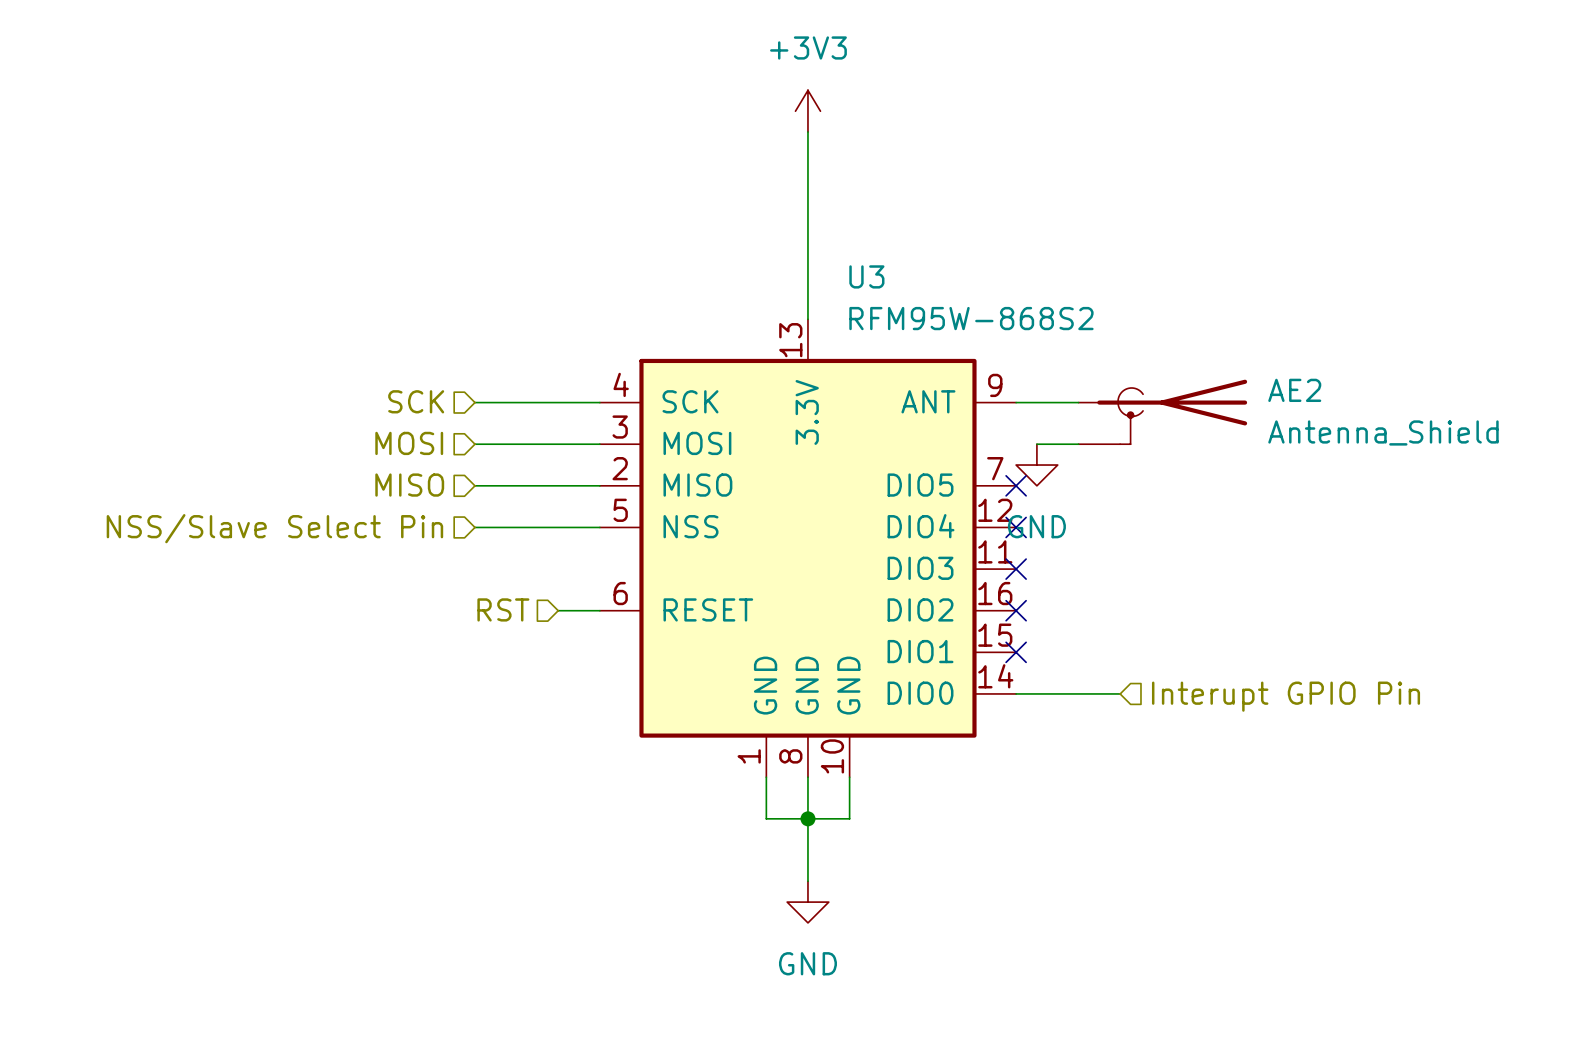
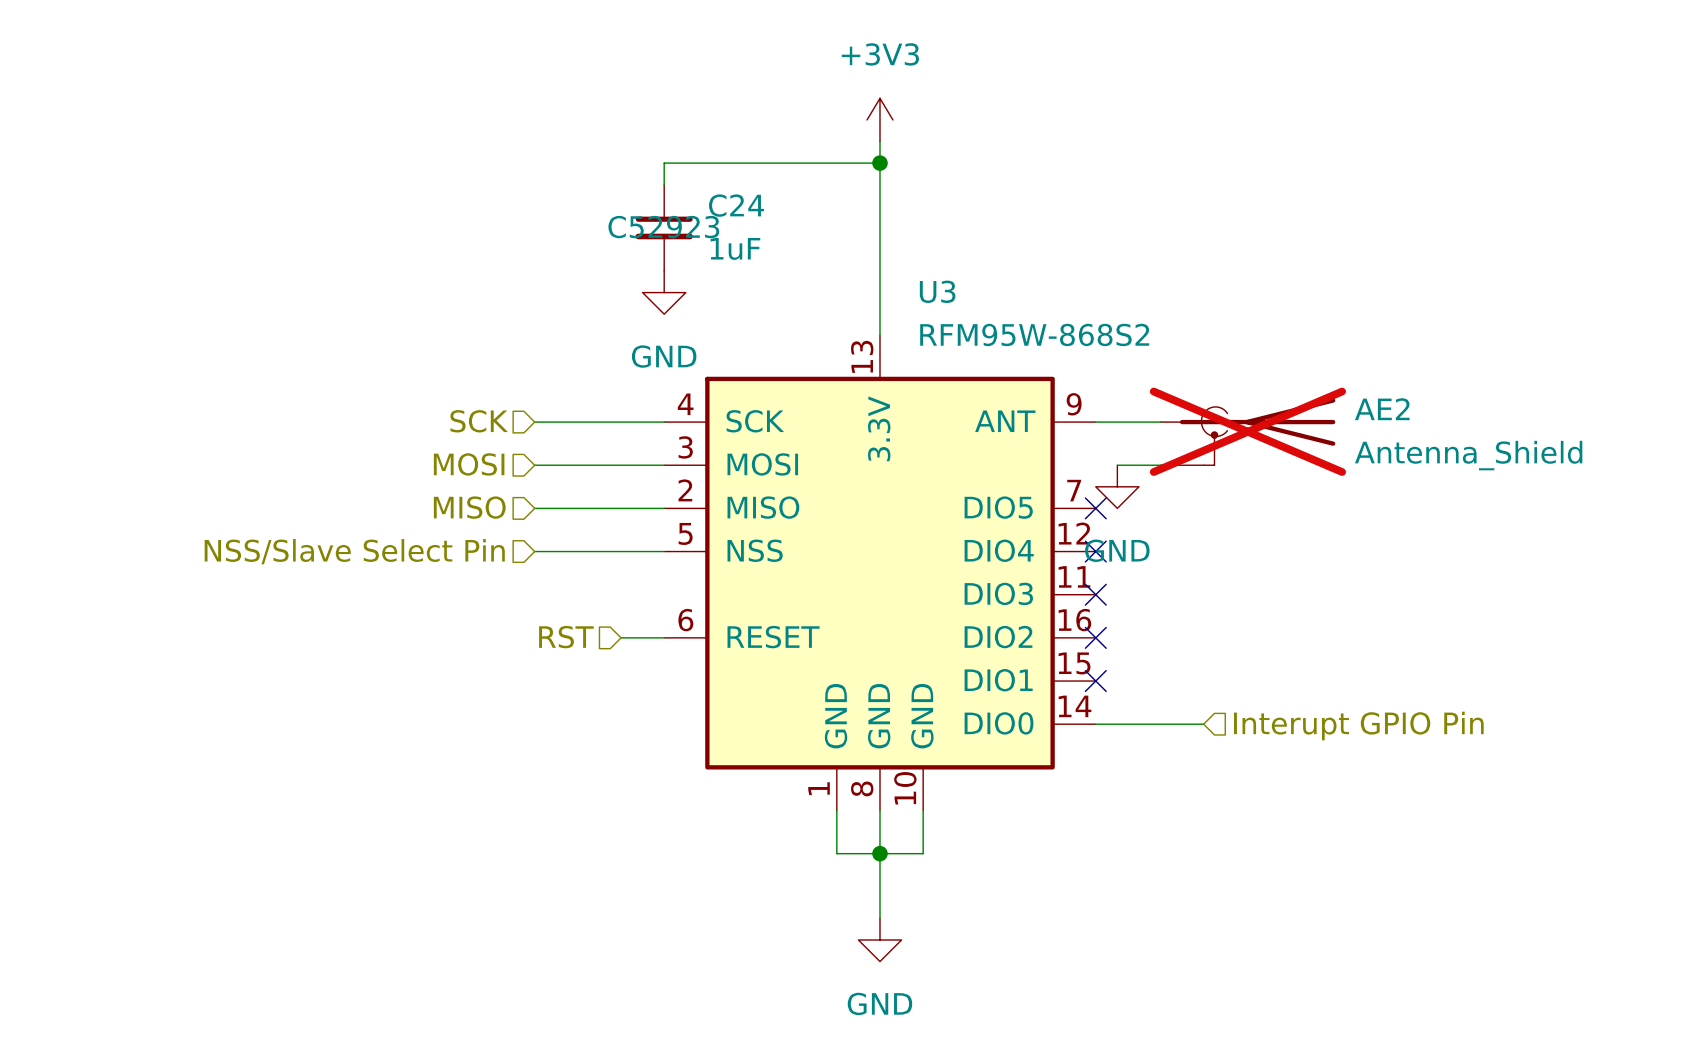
wire: none -> (879, 163) (664, 163) (664, 184)
junction: none -> (879, 163)
C24: none -> 1uF (664, 227)
power symbol: none -> GND (664, 292)
AE2 do-not-place cross: none -> (1247, 431)

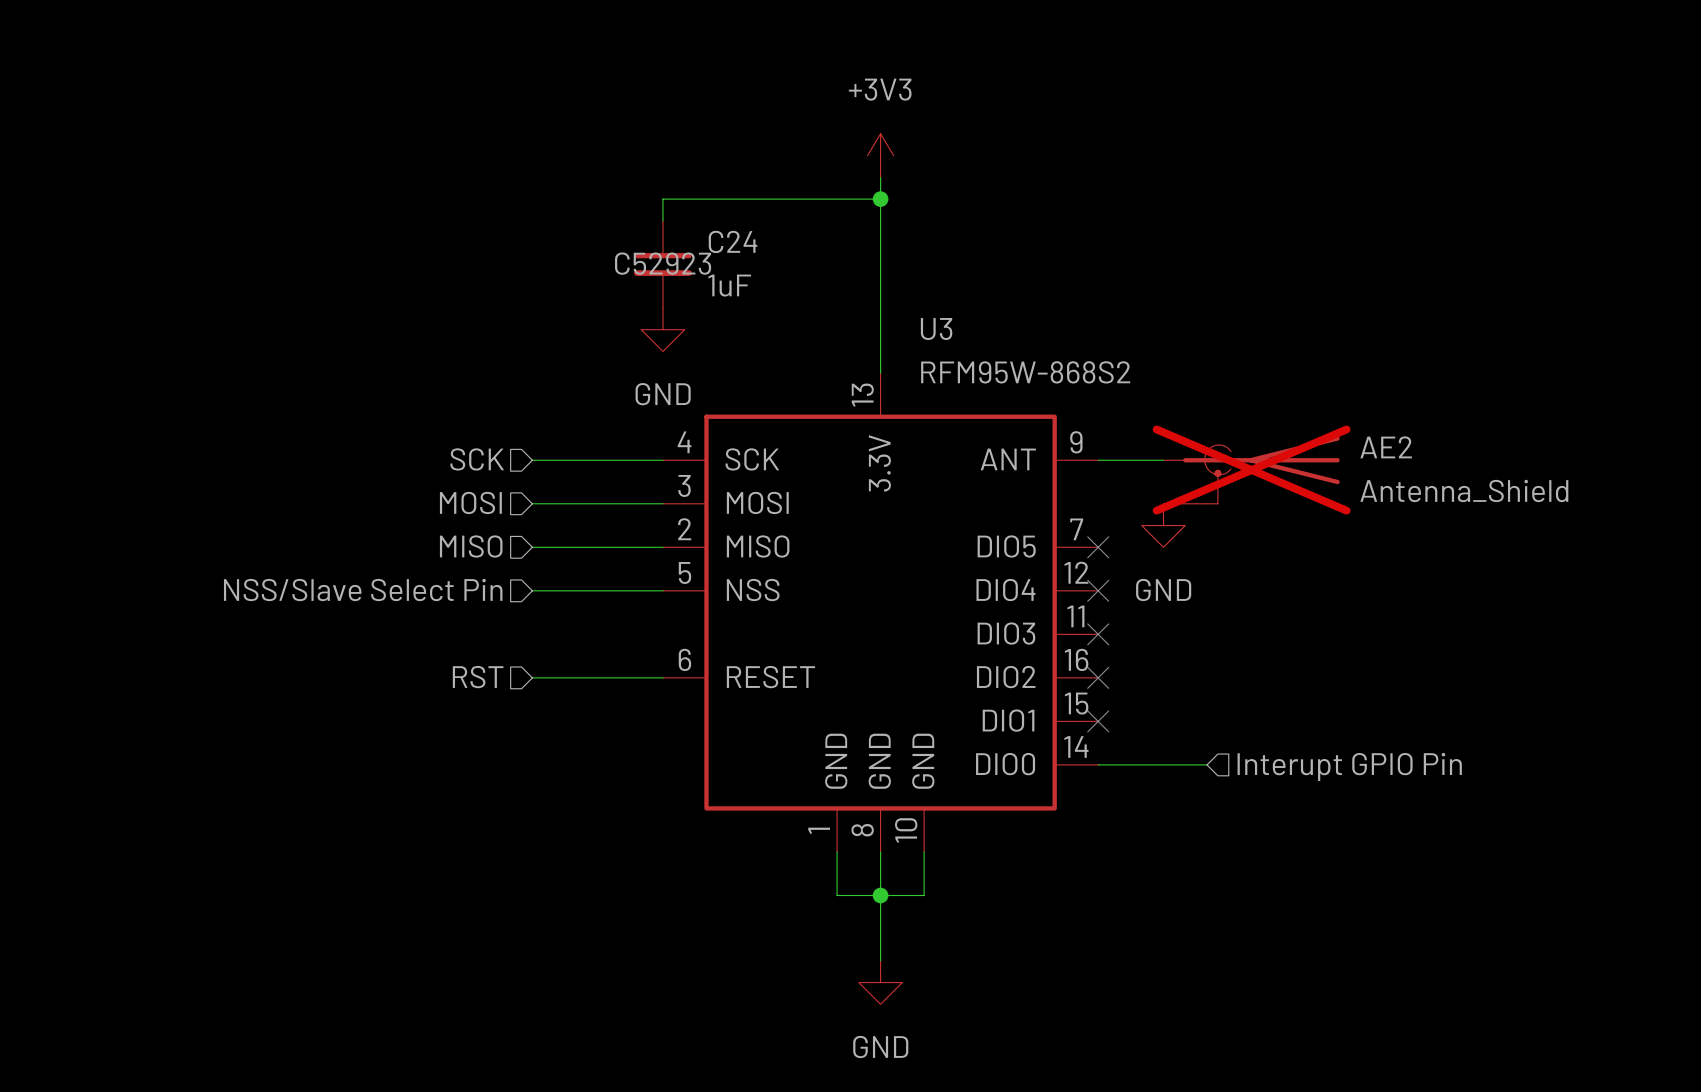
wire: (1117, 465) (1160, 465) -> none
power symbol position: GND (1117, 486) -> GND (1163, 525)
wire: none -> (532, 677) (619, 677)
hierarchical label position: RST (566, 637) -> RST (478, 677)

